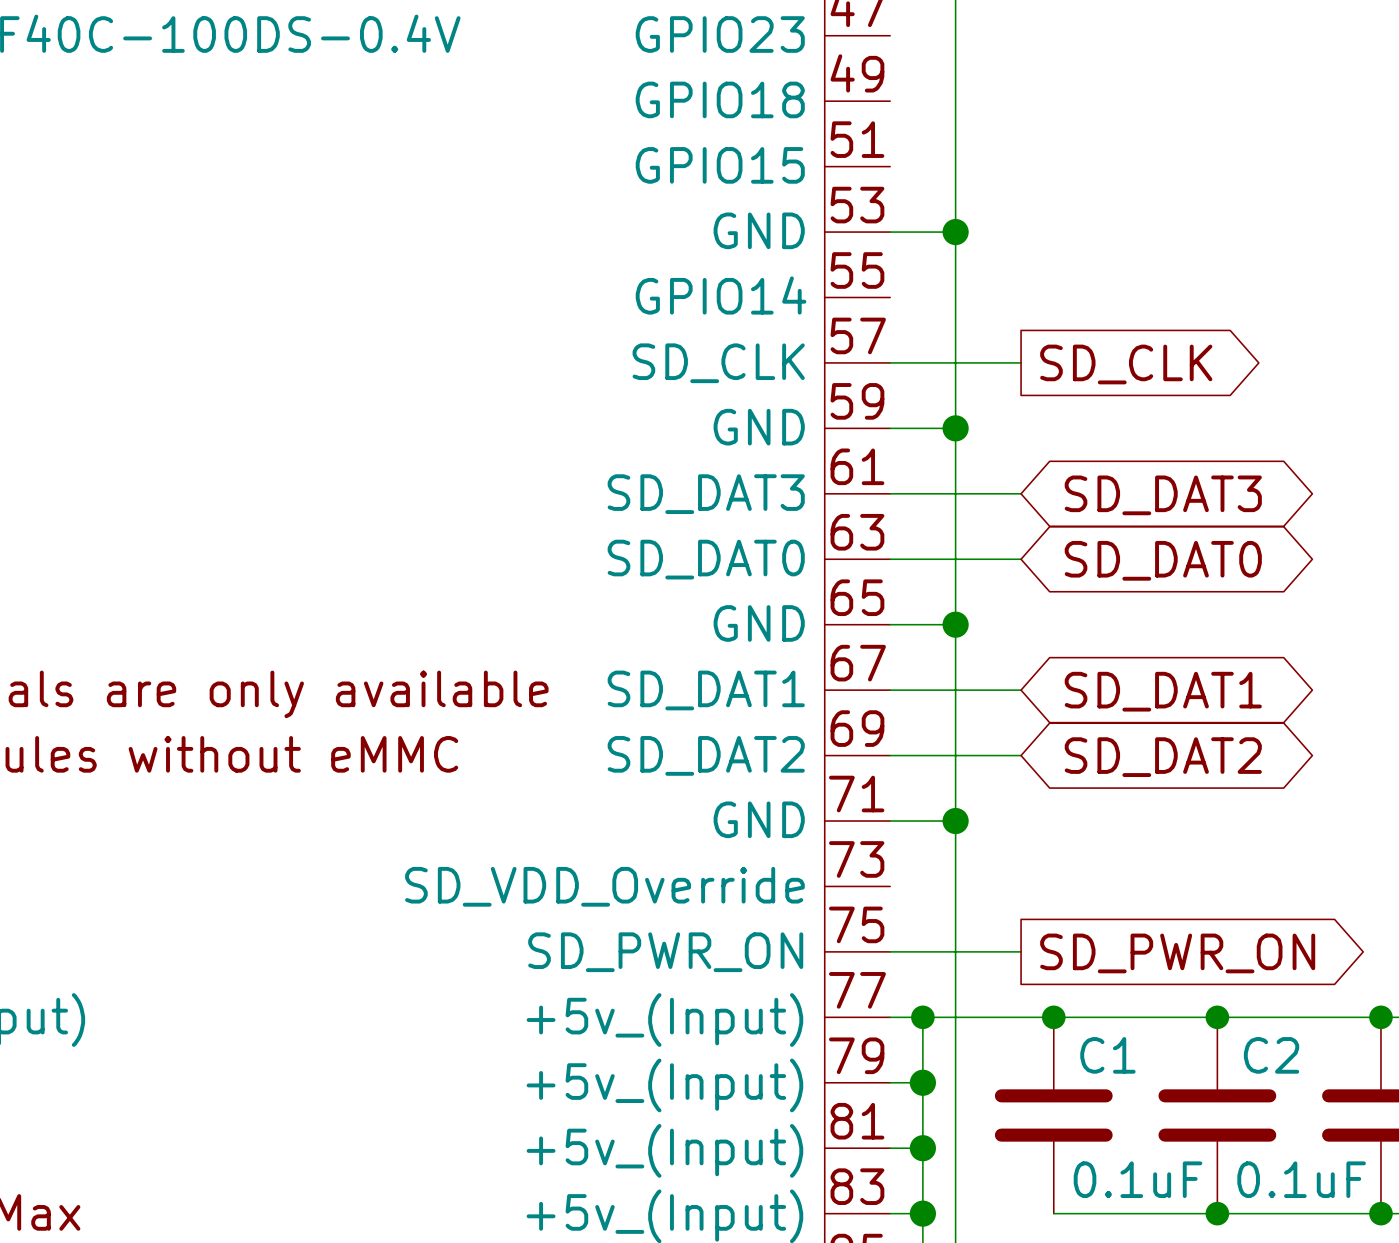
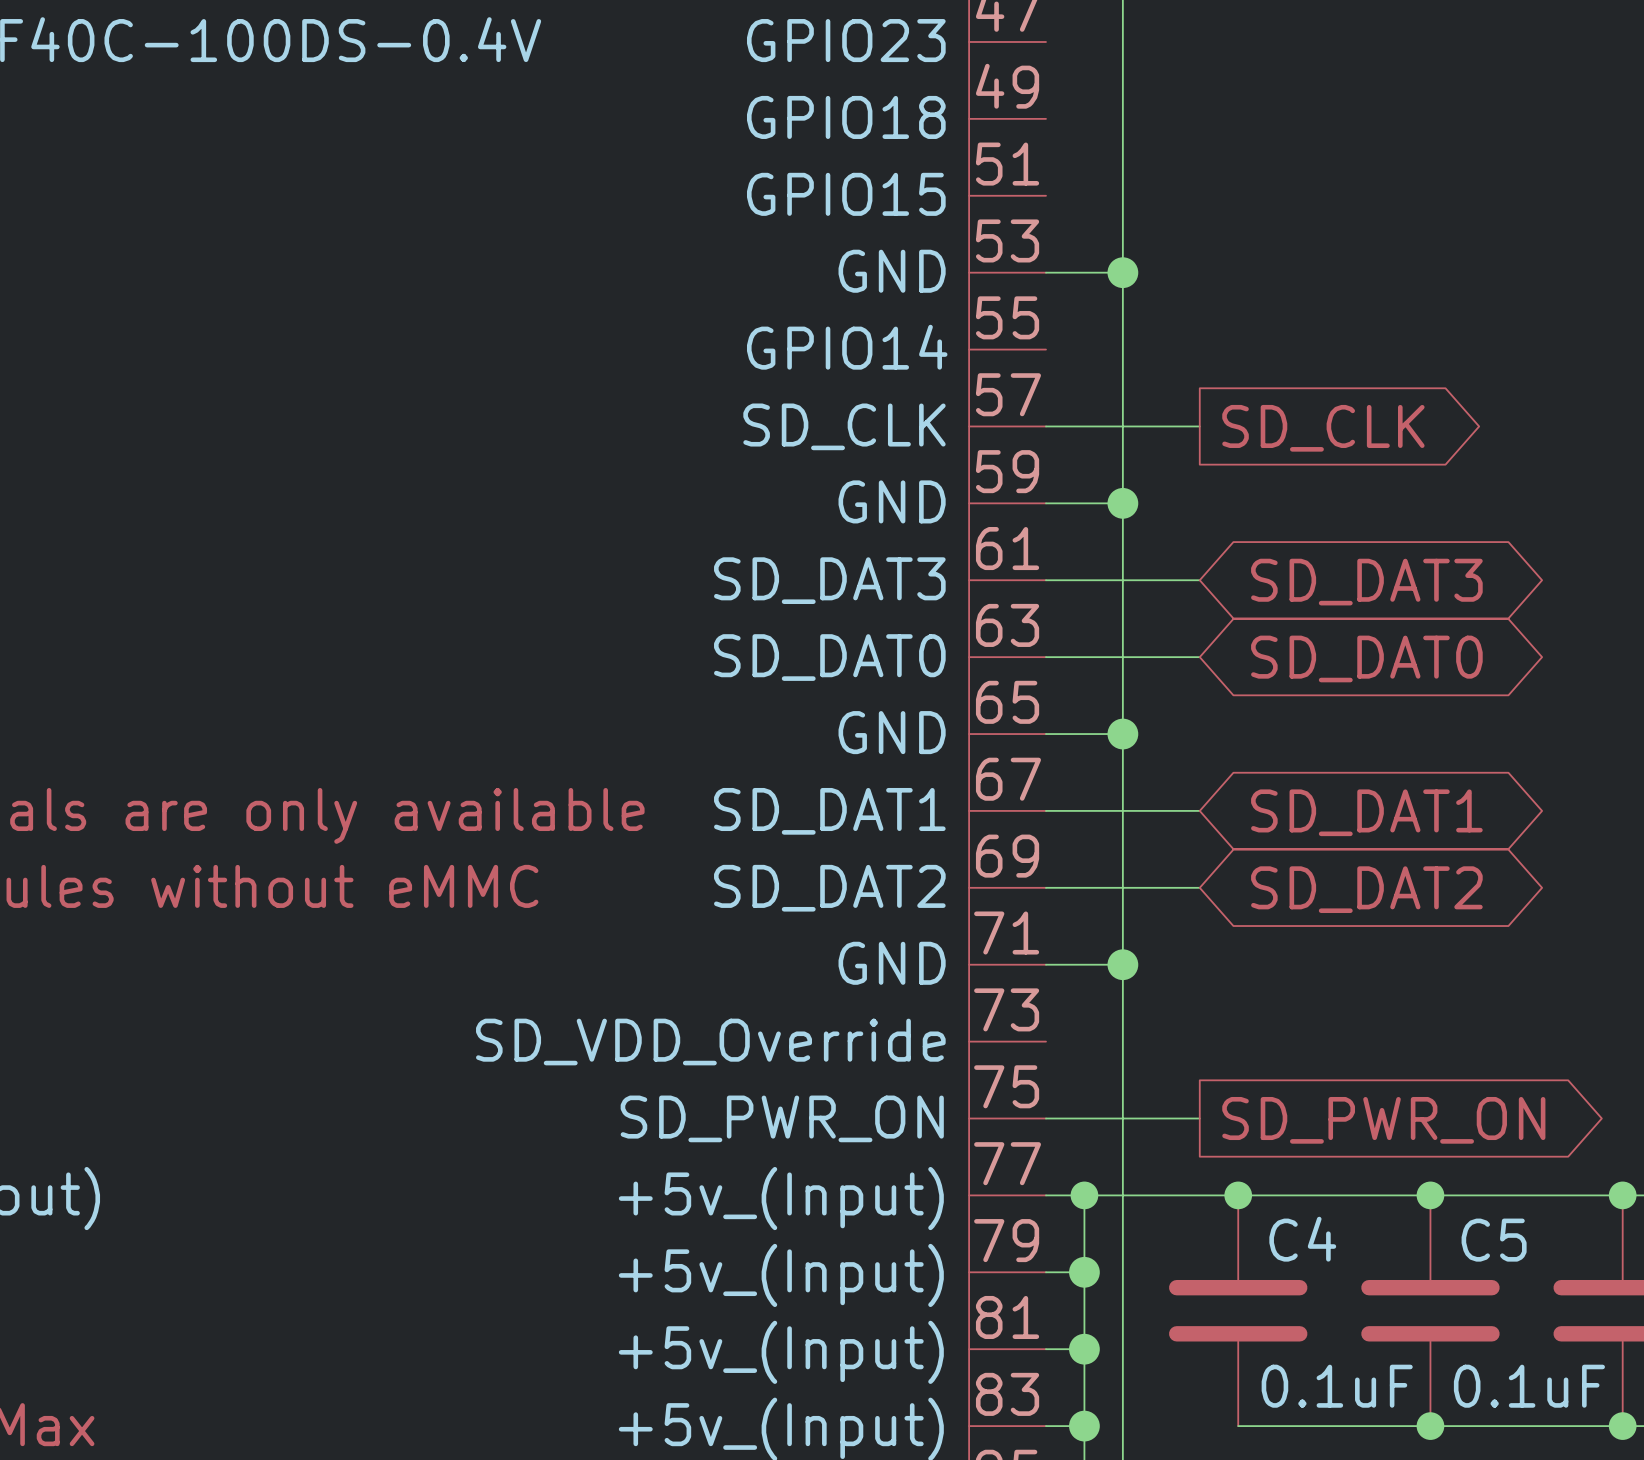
C1 name: C1 (1107, 1055) -> C4 (1302, 1239)
C2 name: C2 (1271, 1055) -> C5 (1494, 1240)

